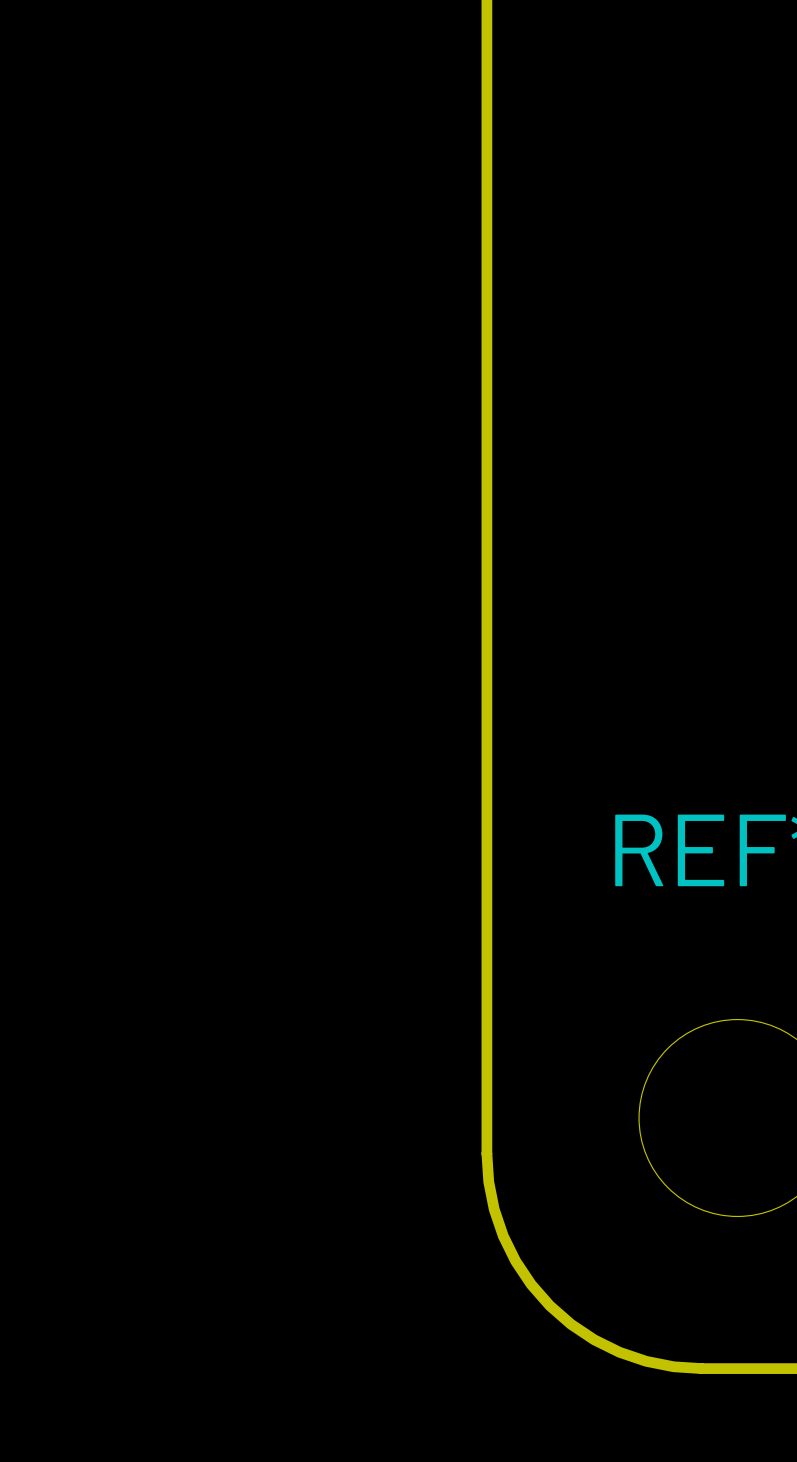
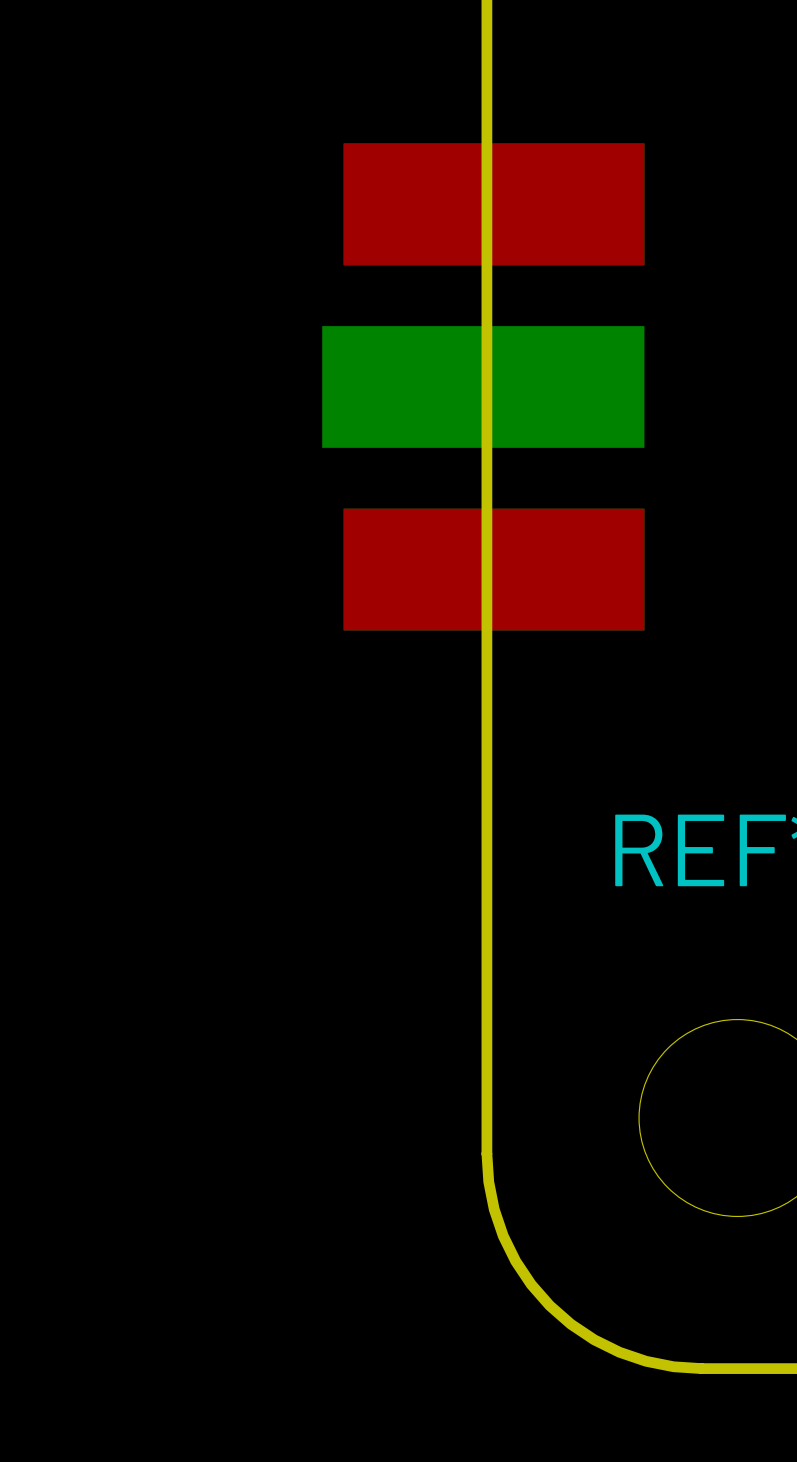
part: none -> (483, 386)

